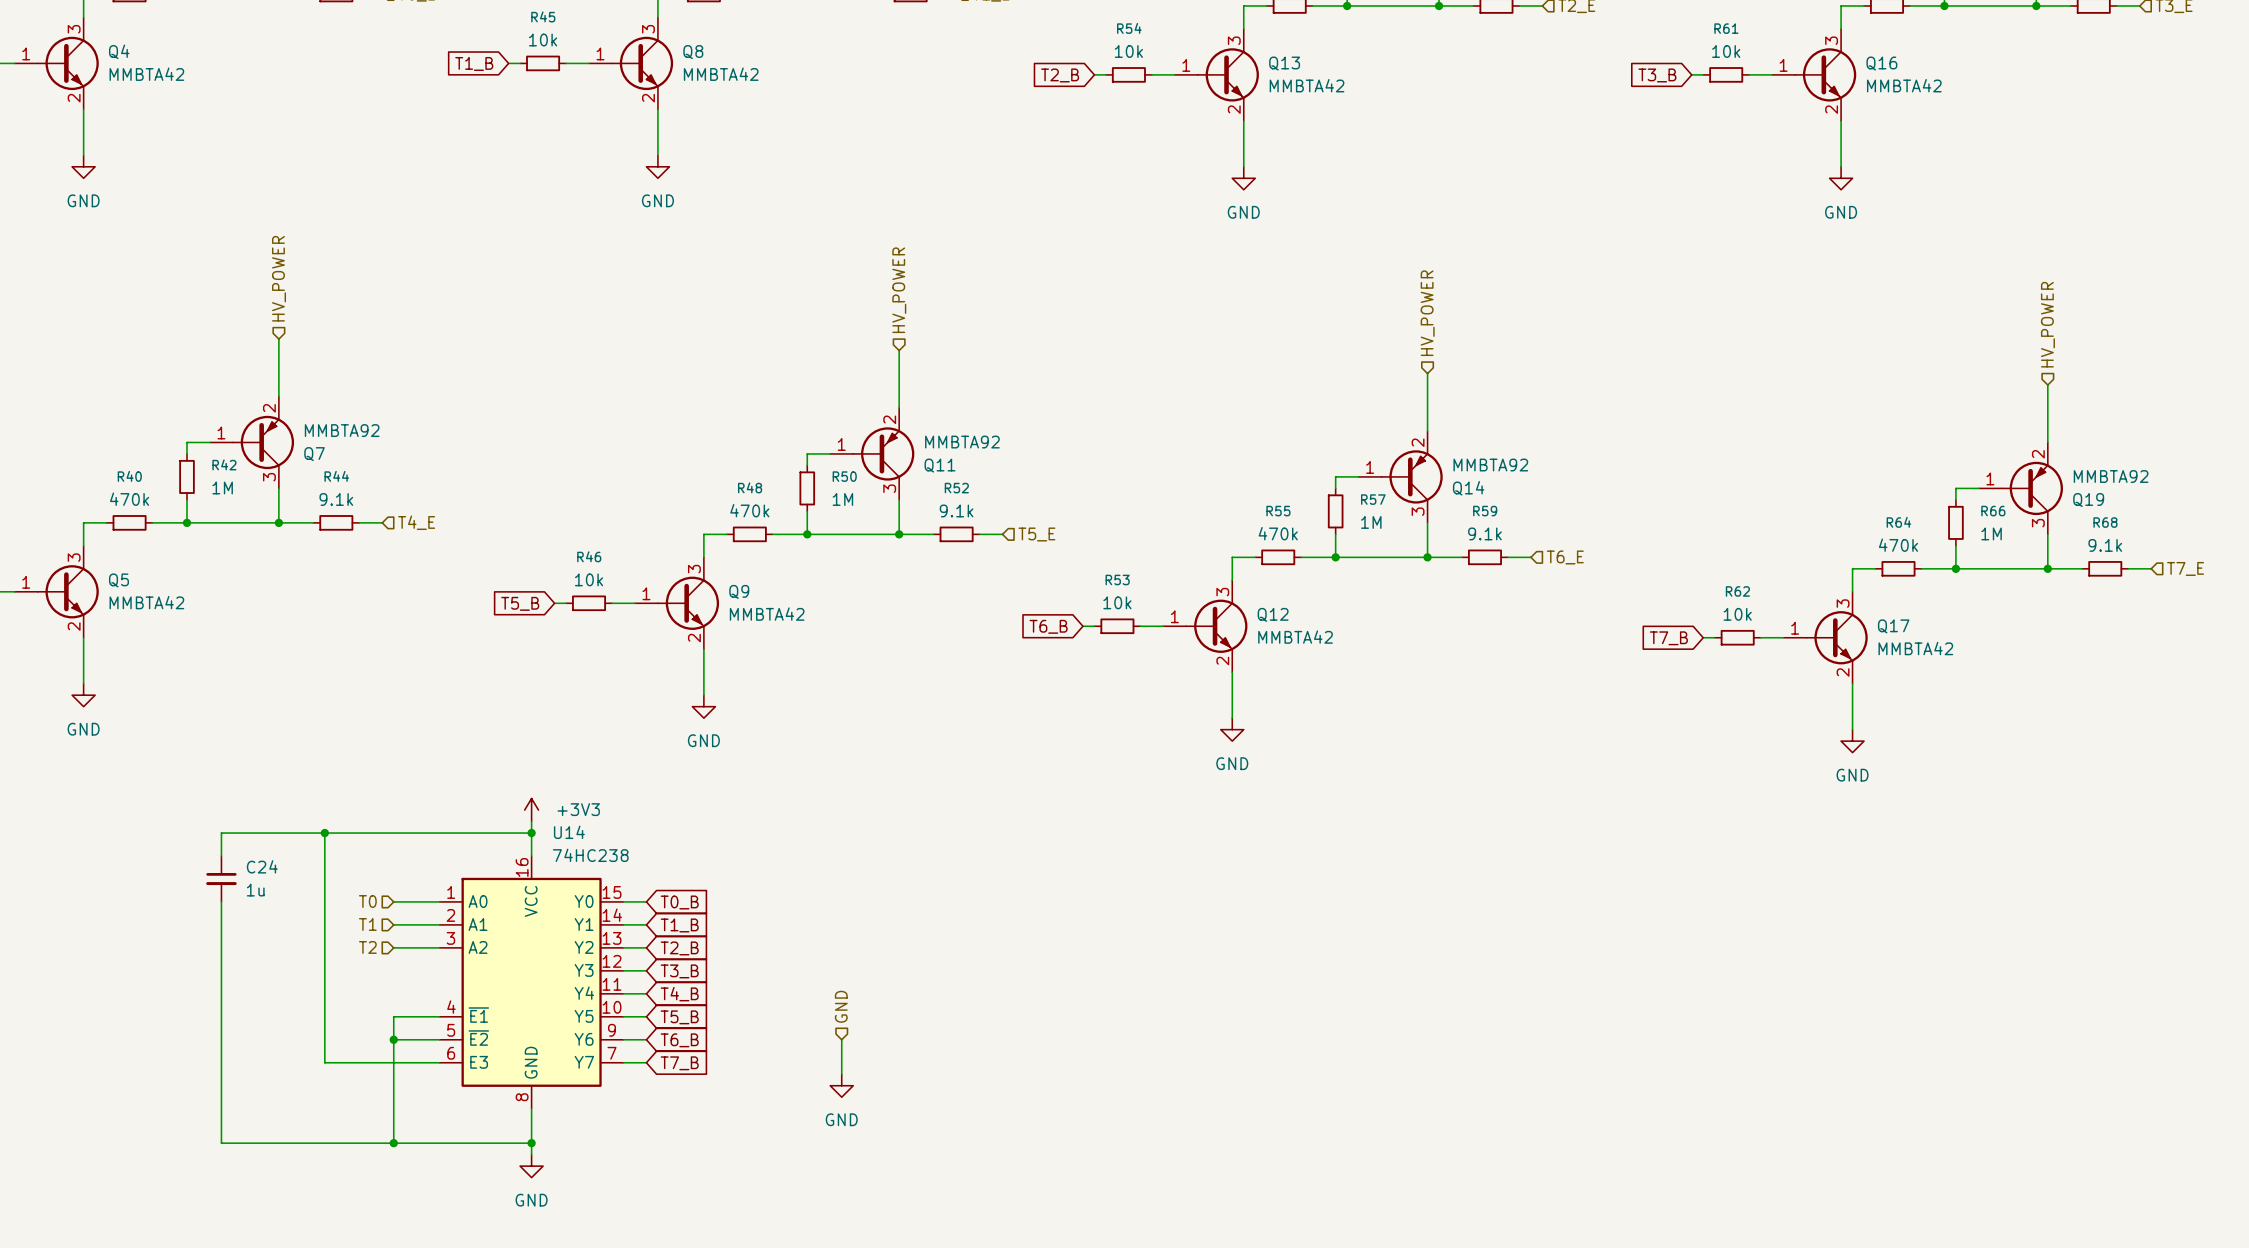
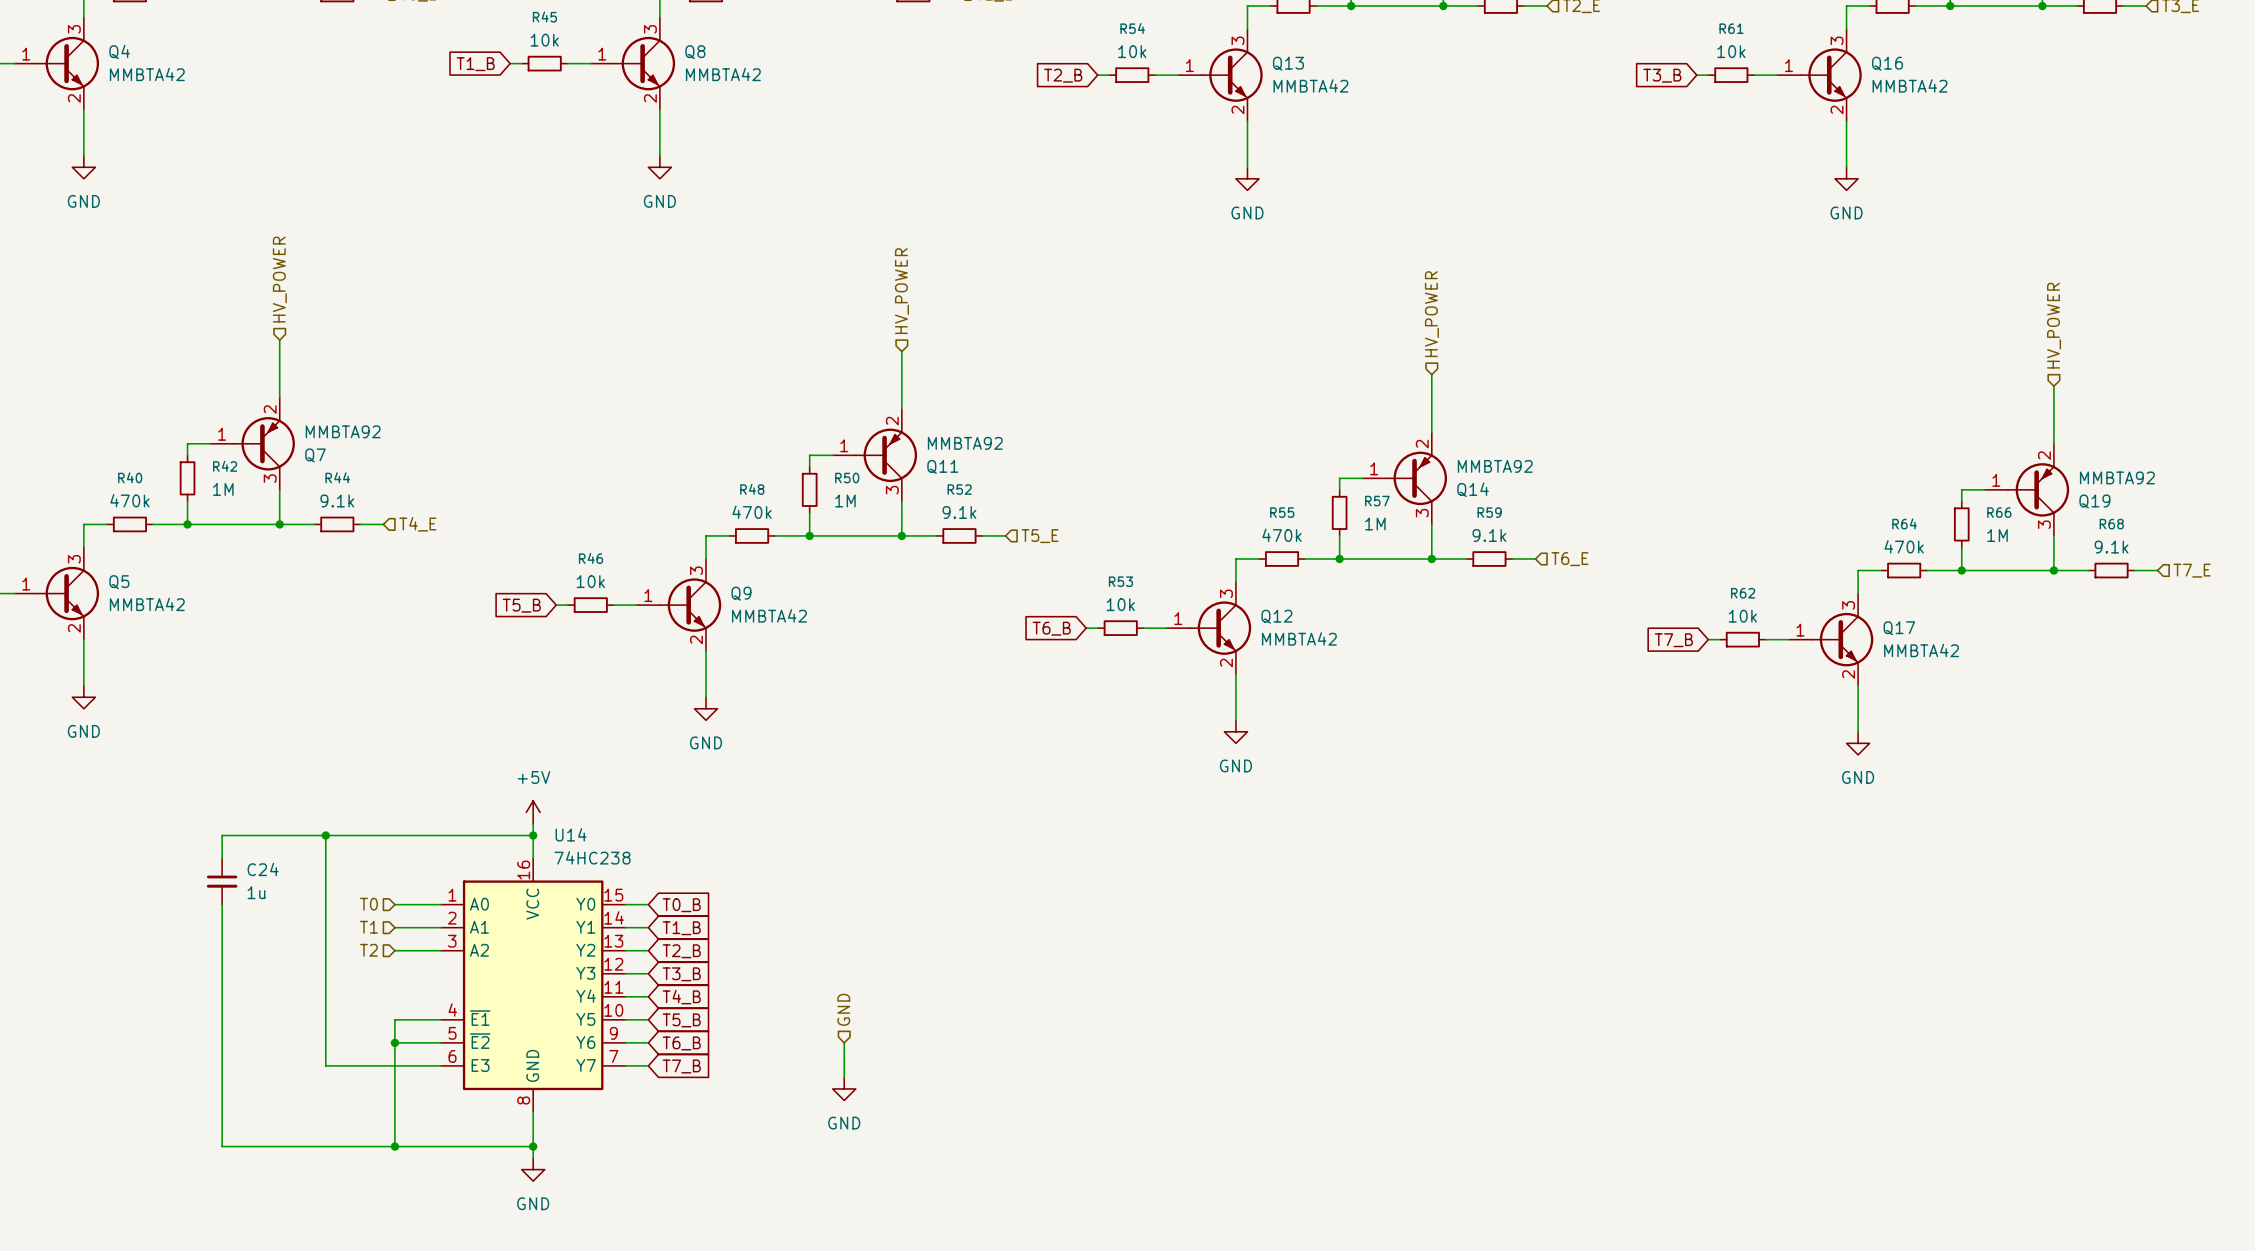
power symbol: +3V3 (531, 810) -> +5V (533, 812)

